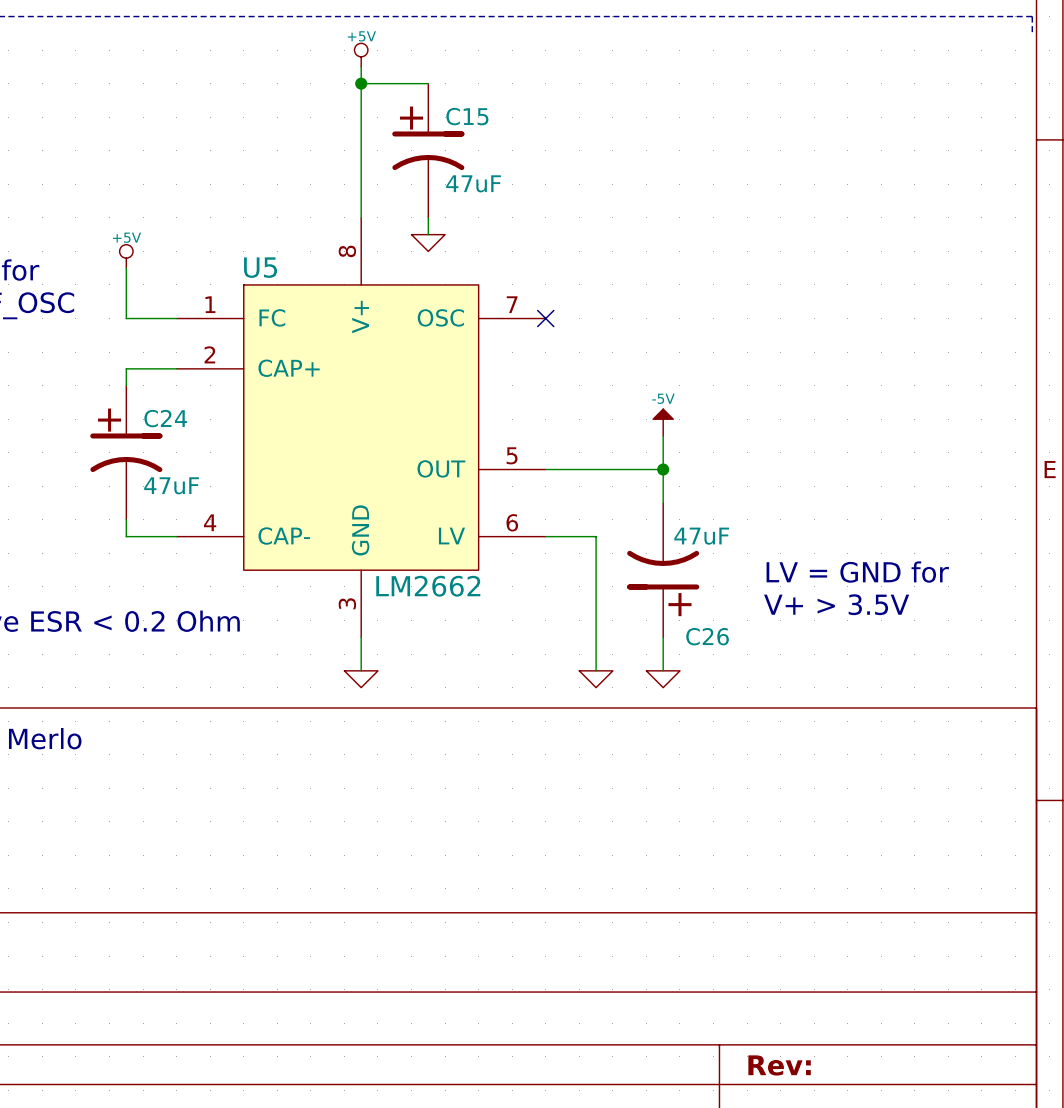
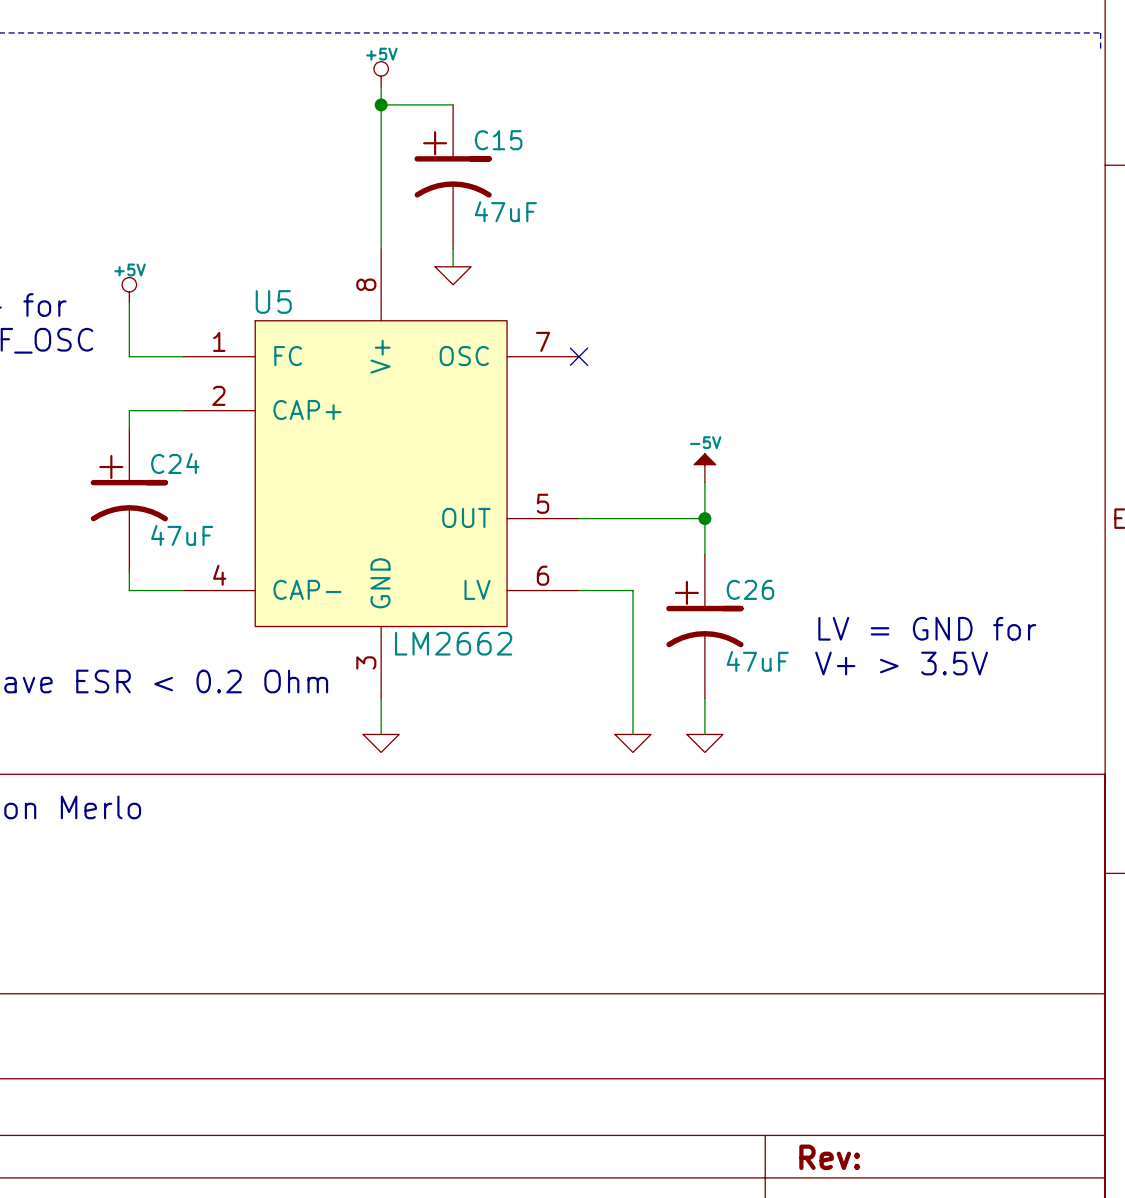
C26 value position: 47uF (701, 536) -> 47uF (757, 661)
C26 rotation: 0° (663, 570) -> 180° (704, 626)
C26 name position: C26 (707, 636) -> C26 (750, 589)

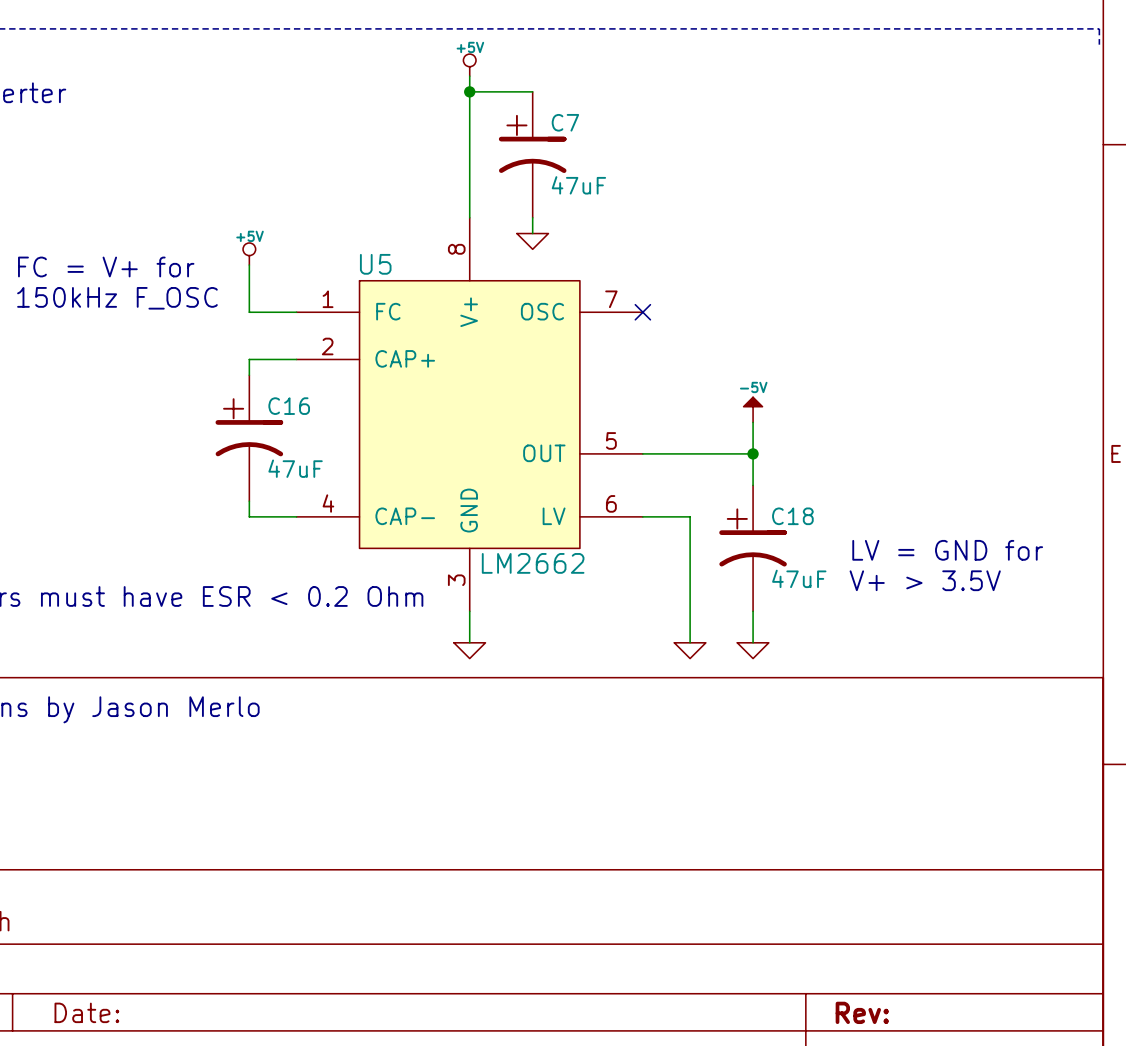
C15 name: C15 (498, 140) -> C7 (565, 122)
C24 name: C24 (175, 463) -> C16 (289, 406)
C26 name: C26 (750, 589) -> C18 (792, 516)

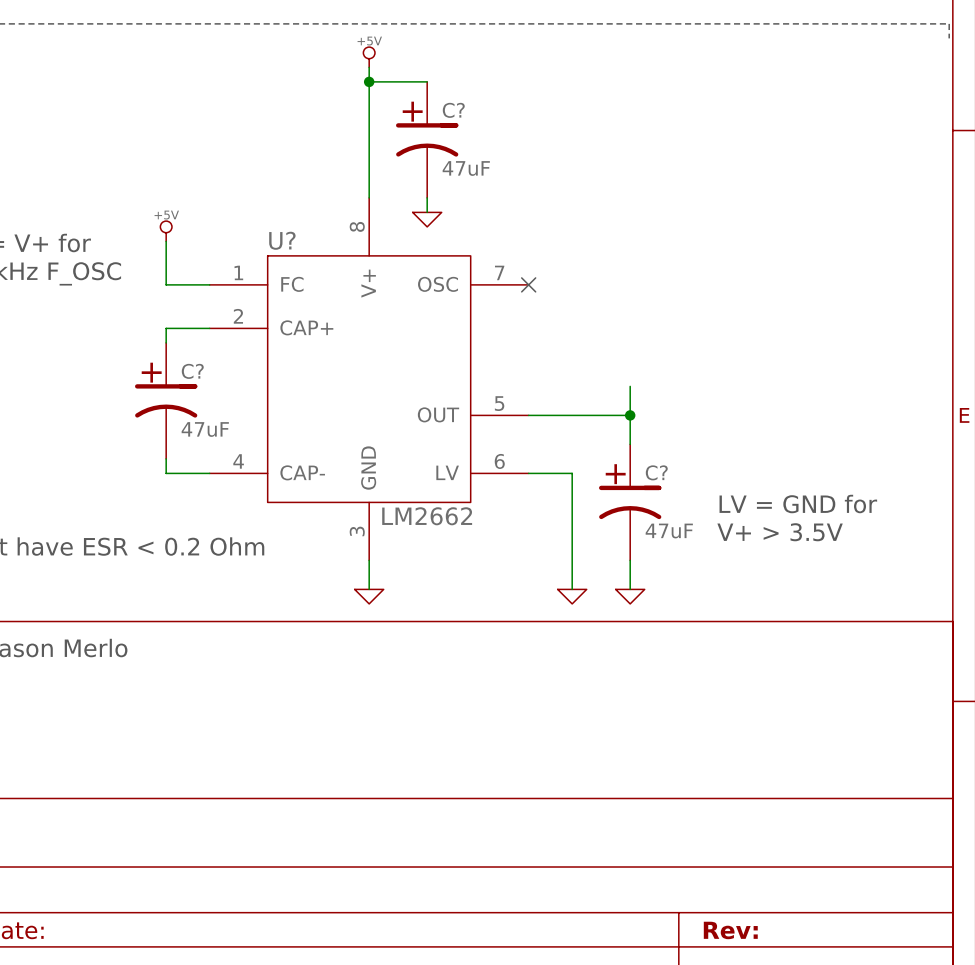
C7 name: C7 (565, 122) -> C? (453, 110)
U5 name: U5 (375, 264) -> U? (282, 240)
C16 name: C16 (289, 406) -> C? (192, 371)
power symbol: -5V (753, 409) -> none
C18 name: C18 (792, 516) -> C? (656, 472)

